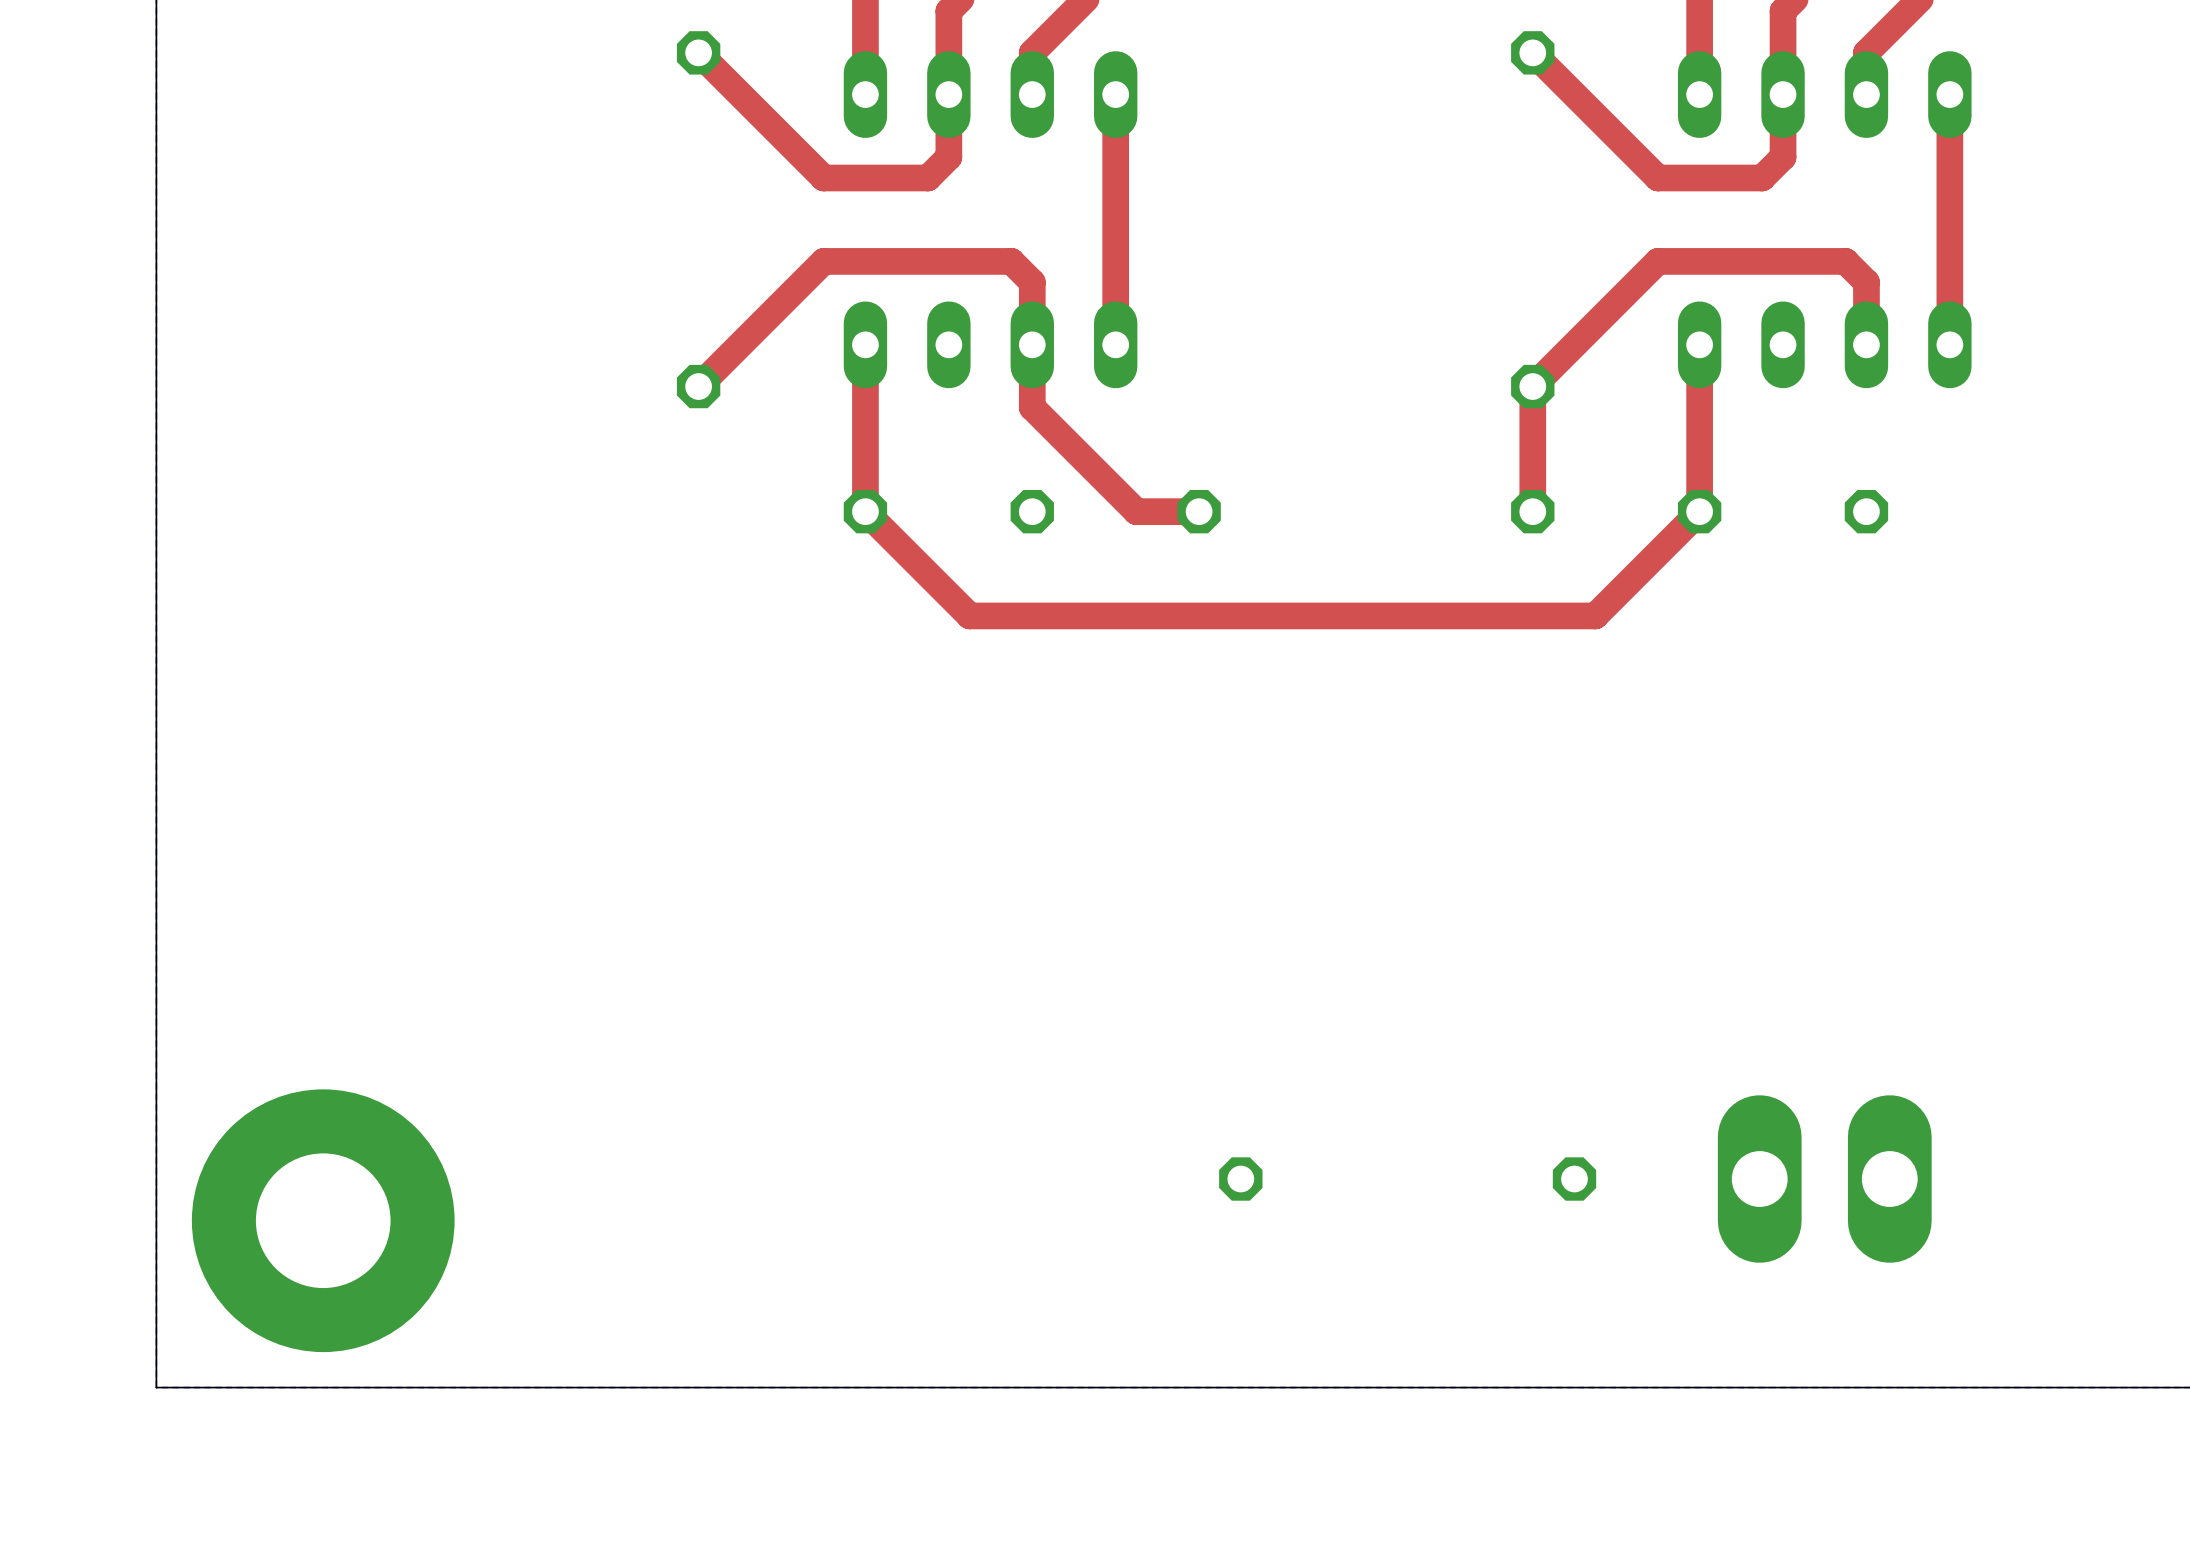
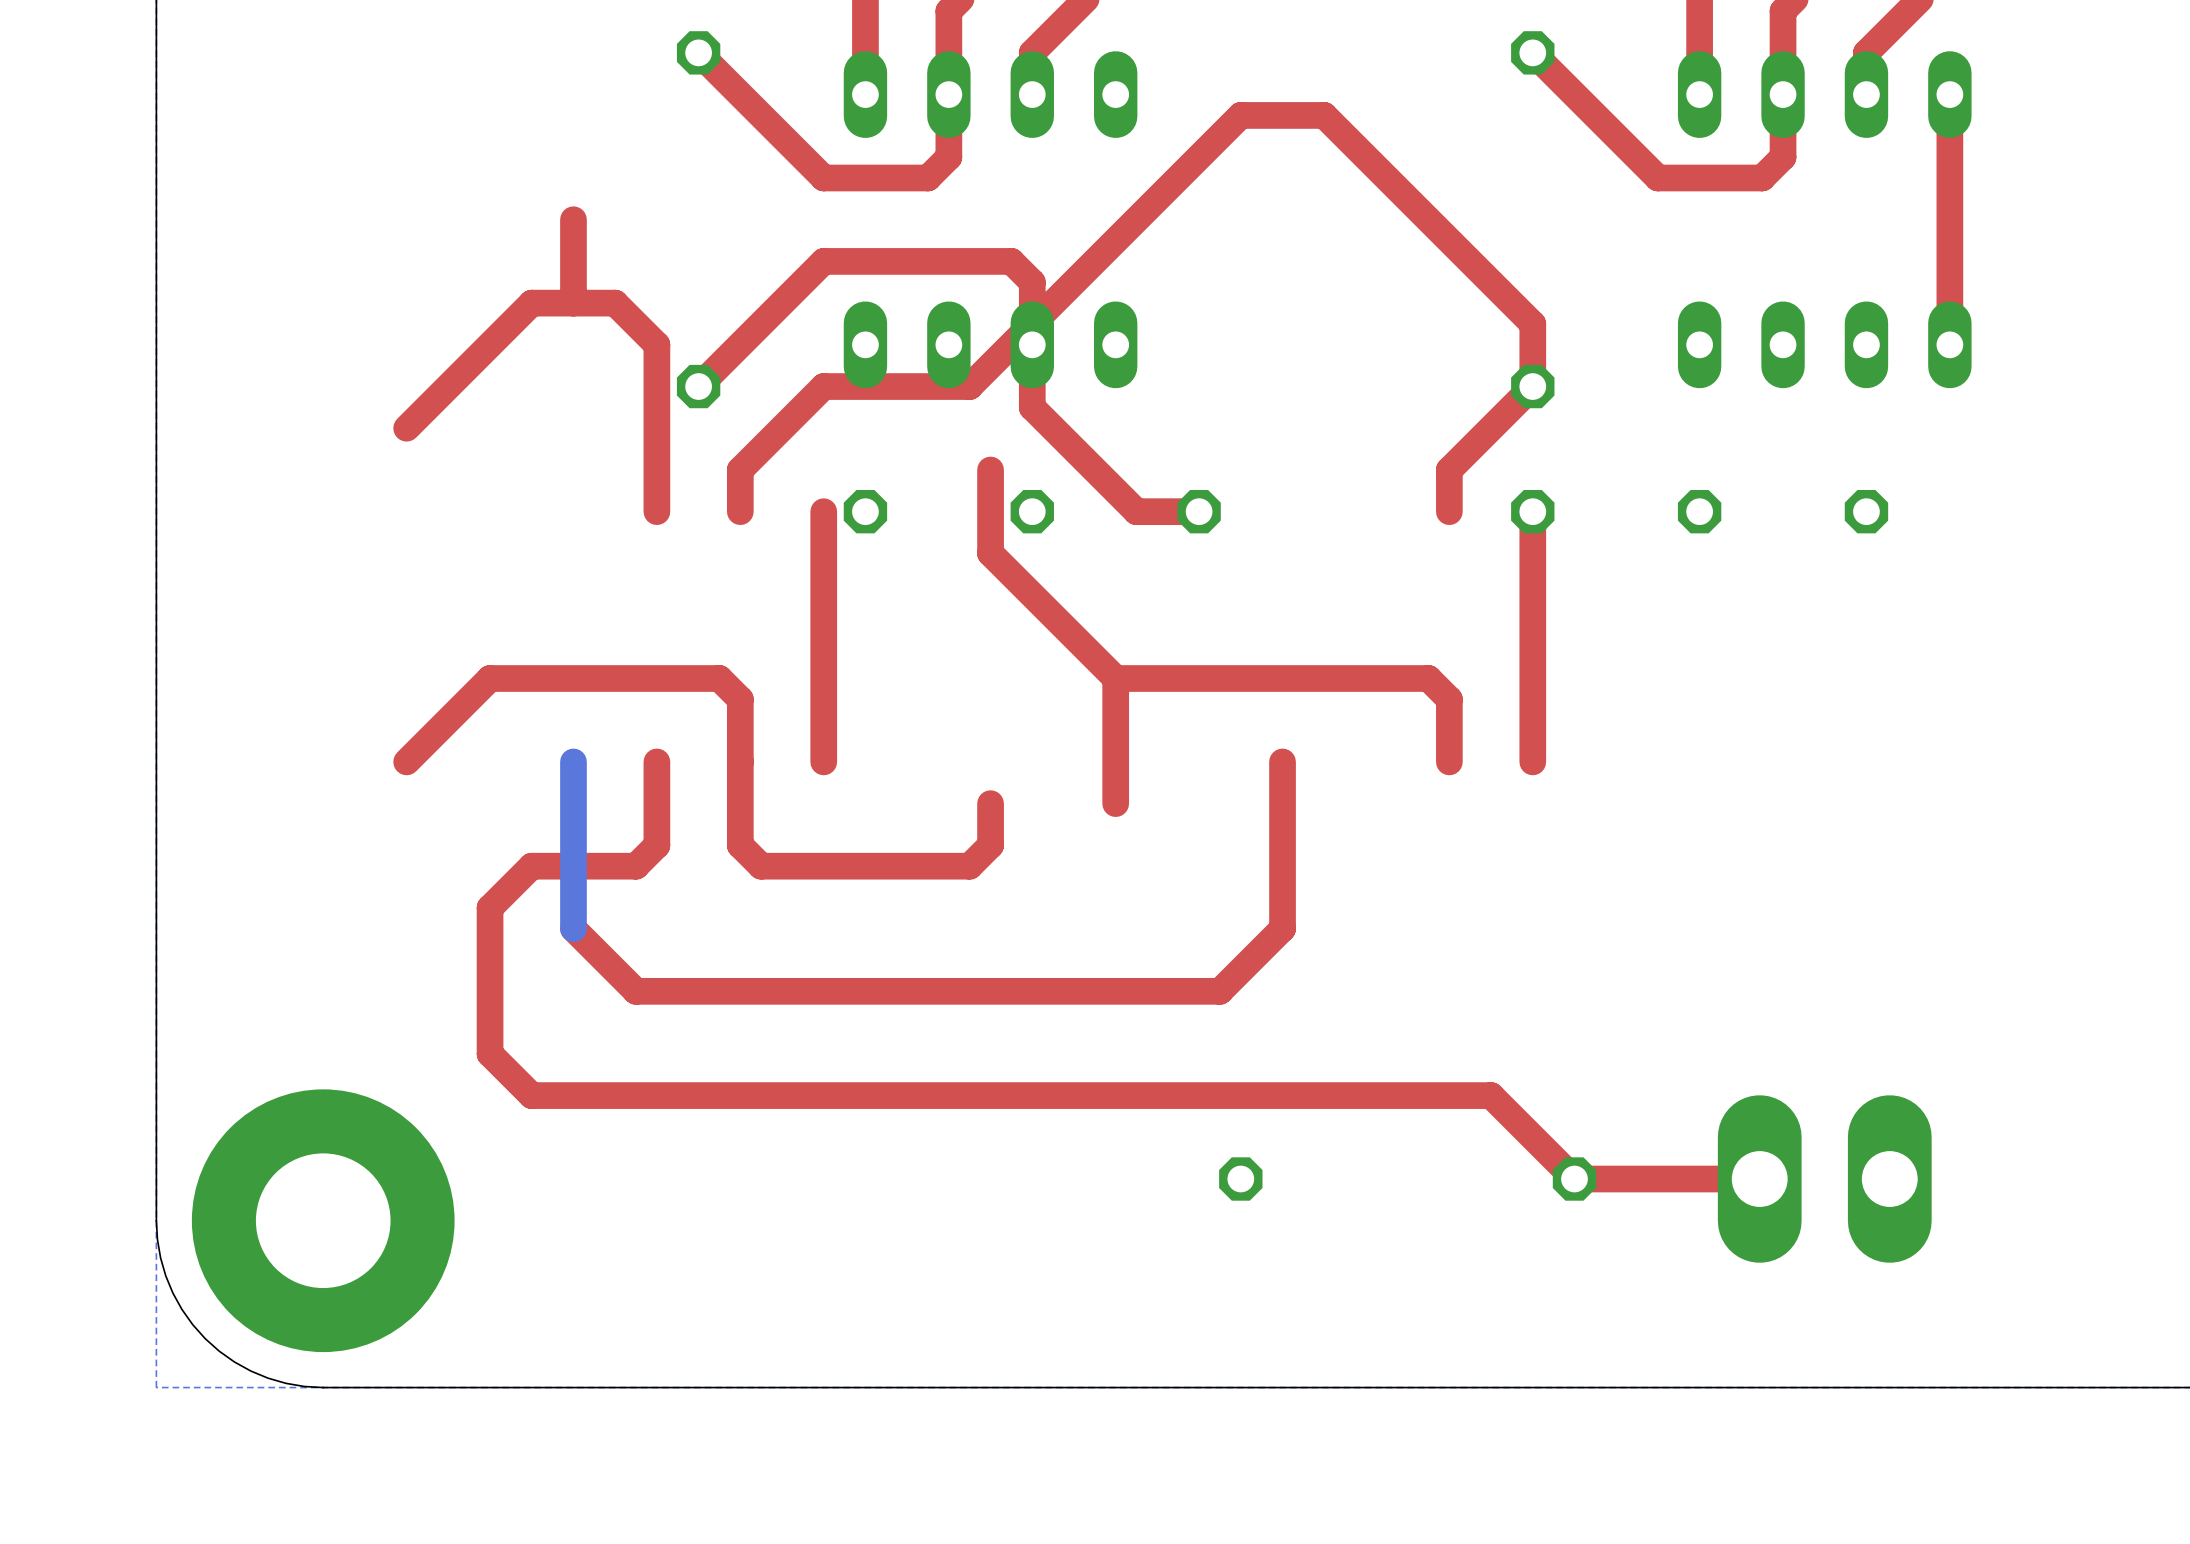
top track: (1115, 94) (1115, 344) -> (823, 511) (823, 761)
top track: none -> (573, 219) (573, 303)
top track: (1699, 344) (1699, 511) (1595, 615) (969, 615) (865, 511) (865, 344) -> none
top track: (1866, 344) (1866, 282) (1845, 261) (1657, 261) (1532, 386) (1532, 511) -> (1532, 761) (1532, 511)
top track: none -> (406, 428) (531, 303) (615, 303) (656, 344) (656, 511)
top track: none -> (990, 469) (990, 553) (1115, 678)
top track: none -> (1449, 511) (1449, 469) (1532, 386) (1532, 323) (1324, 115) (1240, 115) (969, 386) (823, 386) (740, 469) (740, 511)
top track: none -> (1115, 678) (1428, 678) (1449, 699) (1449, 761)
top track: none -> (1115, 678) (1115, 803)
top track: none -> (406, 761) (490, 678) (719, 678) (740, 699) (740, 845) (761, 866) (969, 866) (990, 845) (990, 803)
bottom track: none -> (573, 761) (573, 928)
top track: none -> (656, 761) (656, 845) (636, 866) (531, 866) (490, 907) (490, 1053) (531, 1095) (1491, 1095) (1574, 1179) (1759, 1179)
top track: none -> (1282, 761) (1282, 928) (1219, 991) (636, 991) (573, 928)
board edge: (156, 1220) (156, 1387) (323, 1387) -> (156, 1220) (160, 1257) (172, 1293) (181, 1309) (205, 1338) (234, 1361) (250, 1371) (286, 1383) (323, 1387)

